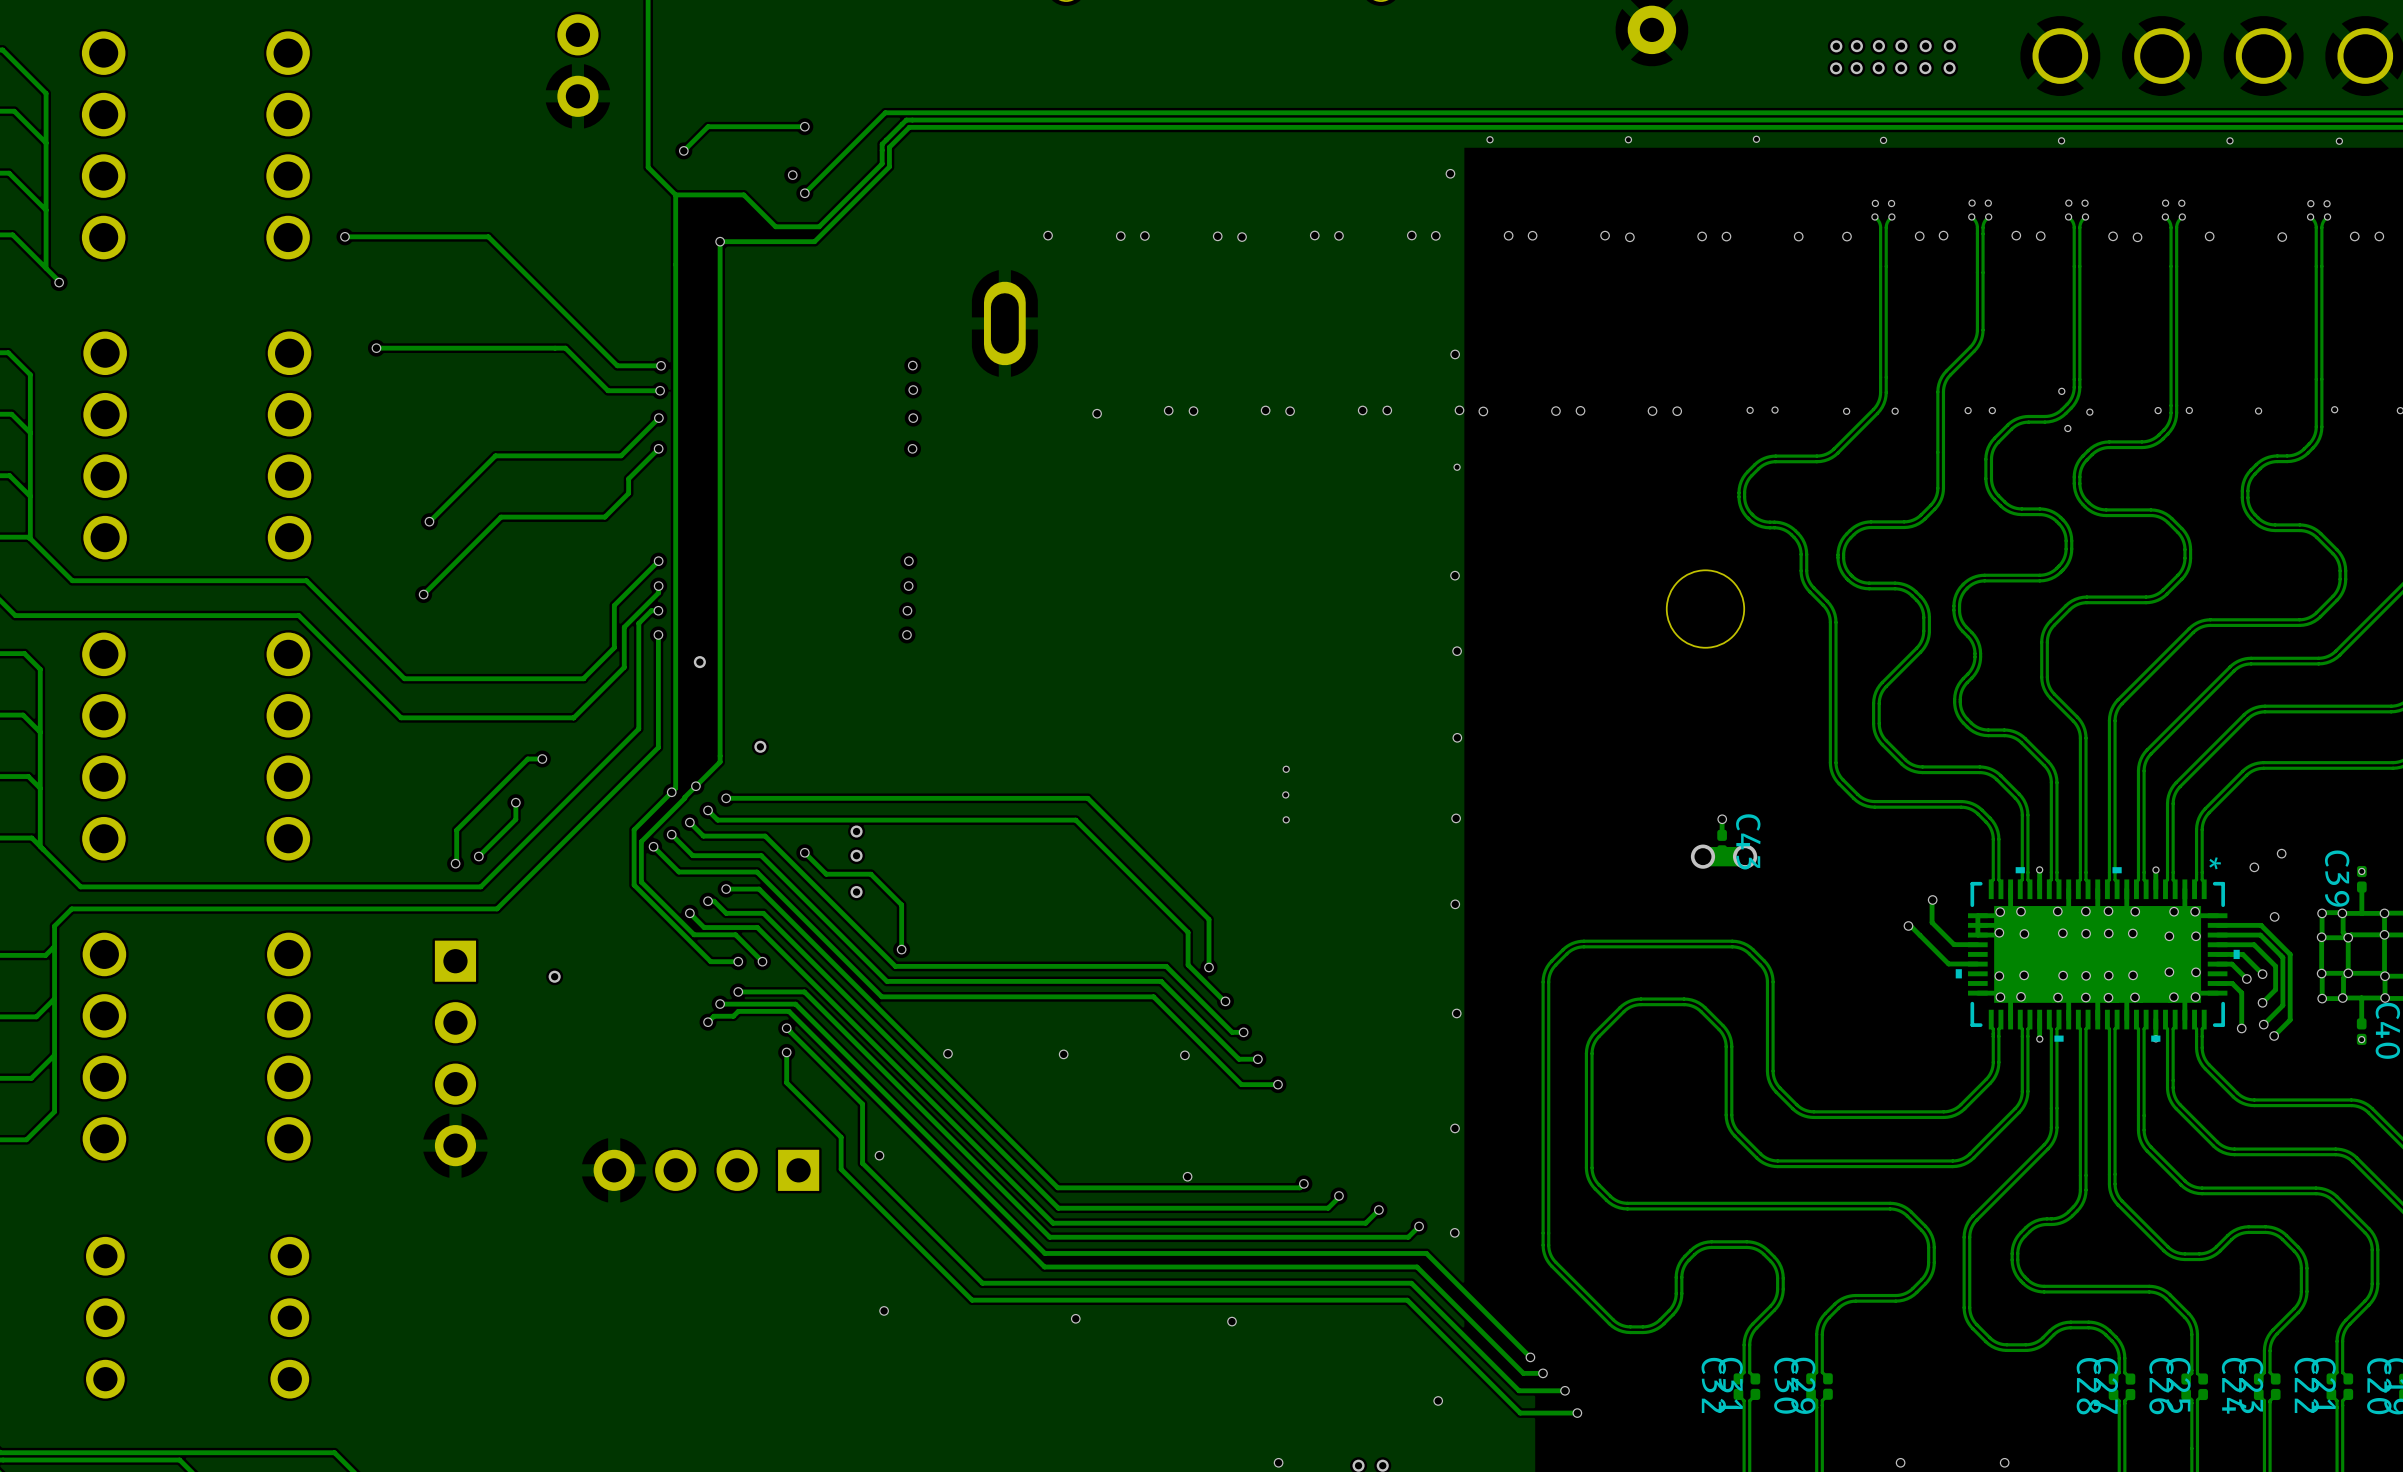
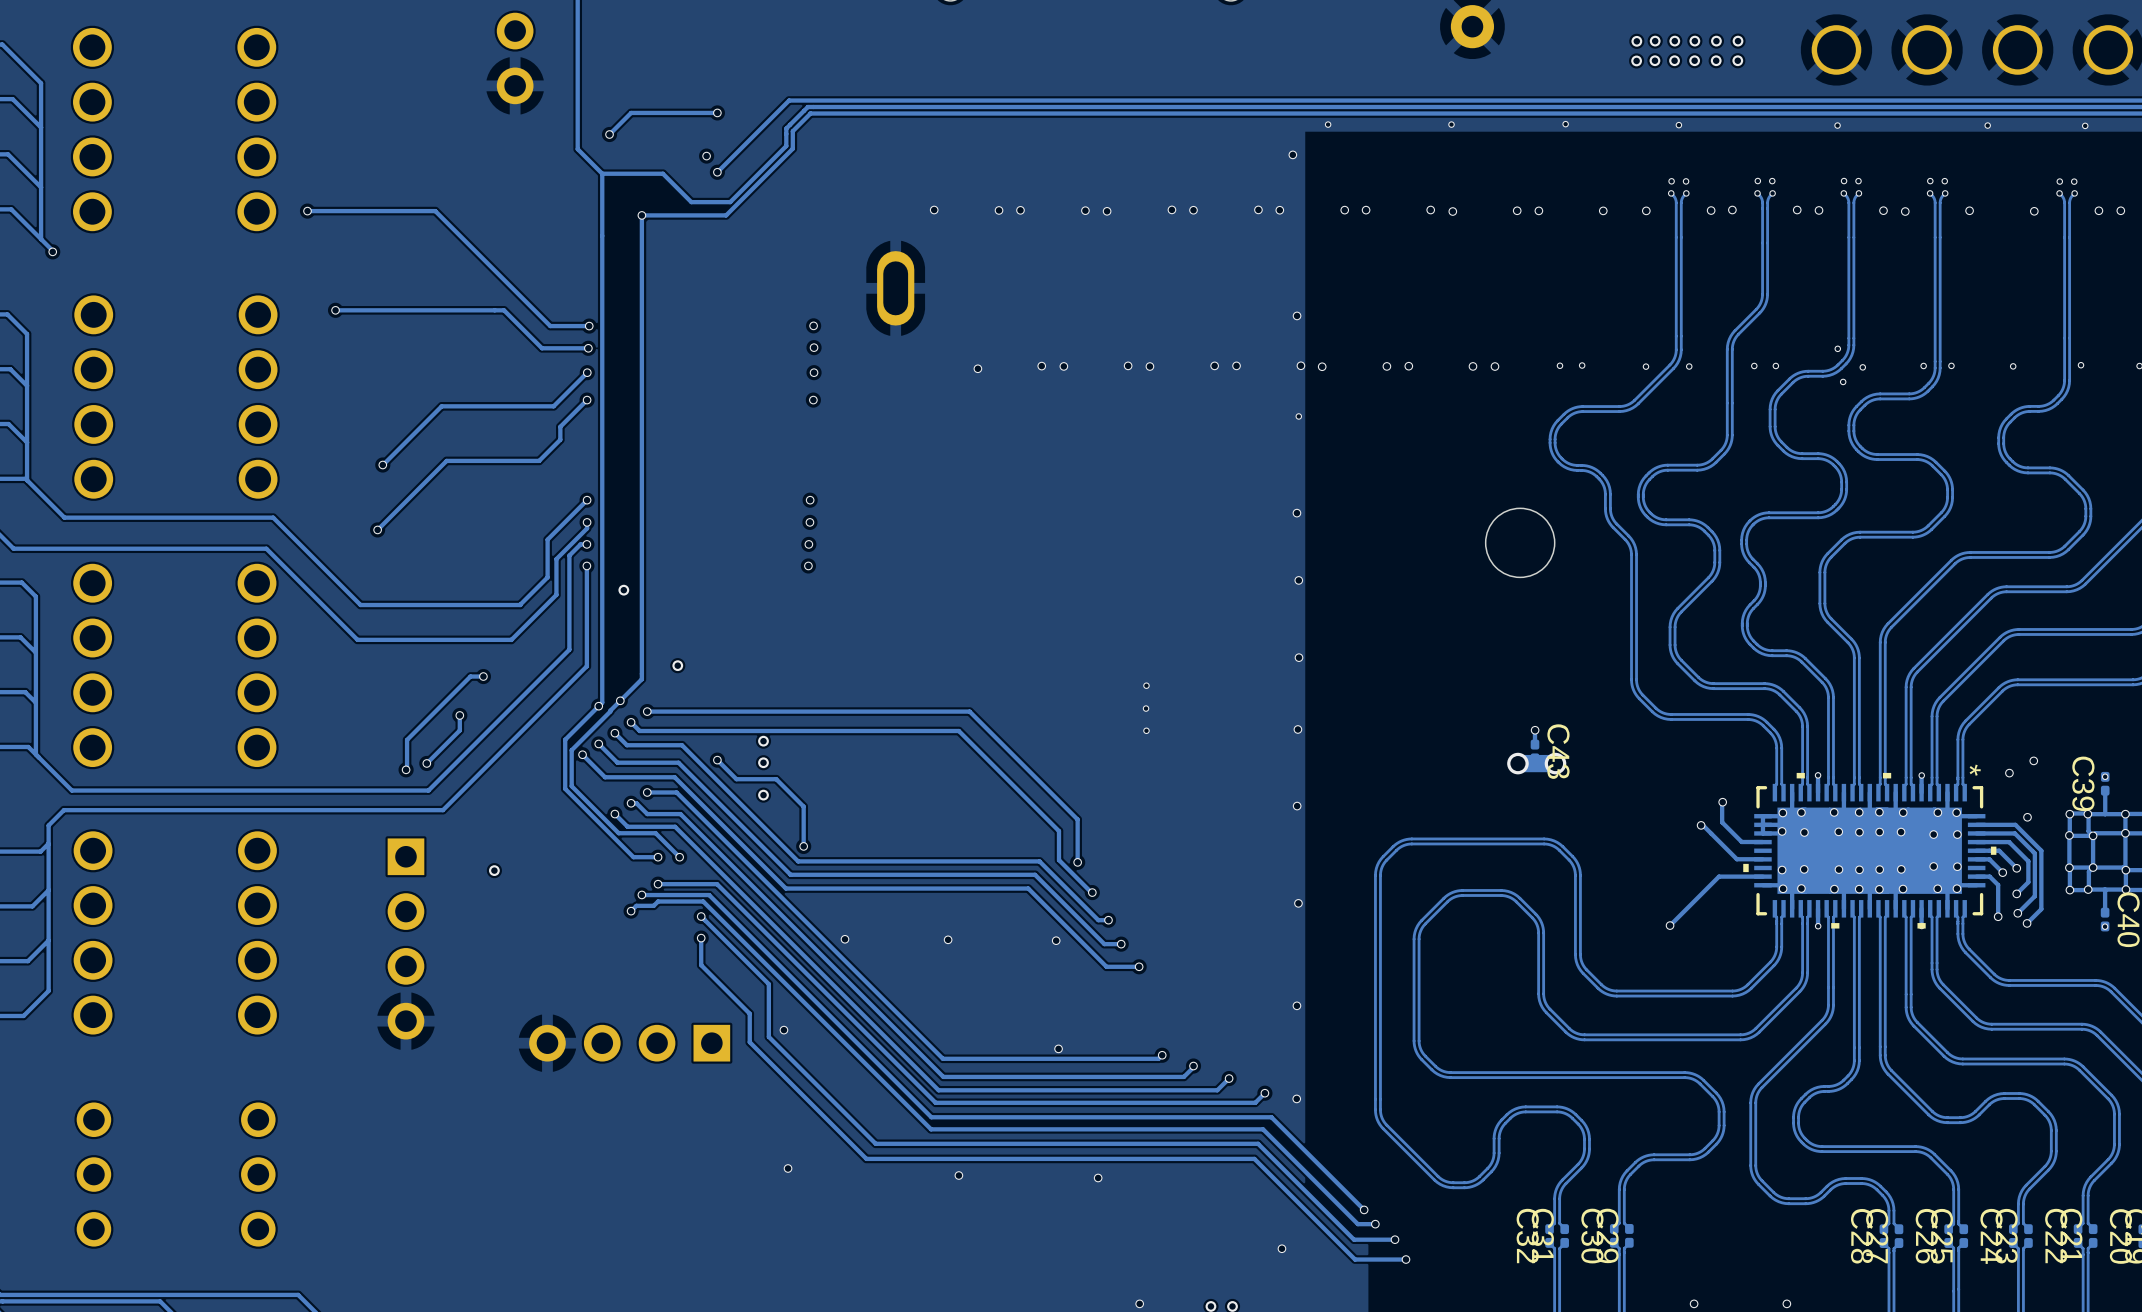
track: none -> (1762, 876) (1719, 876) (1670, 925)
via: none -> (1670, 925)

